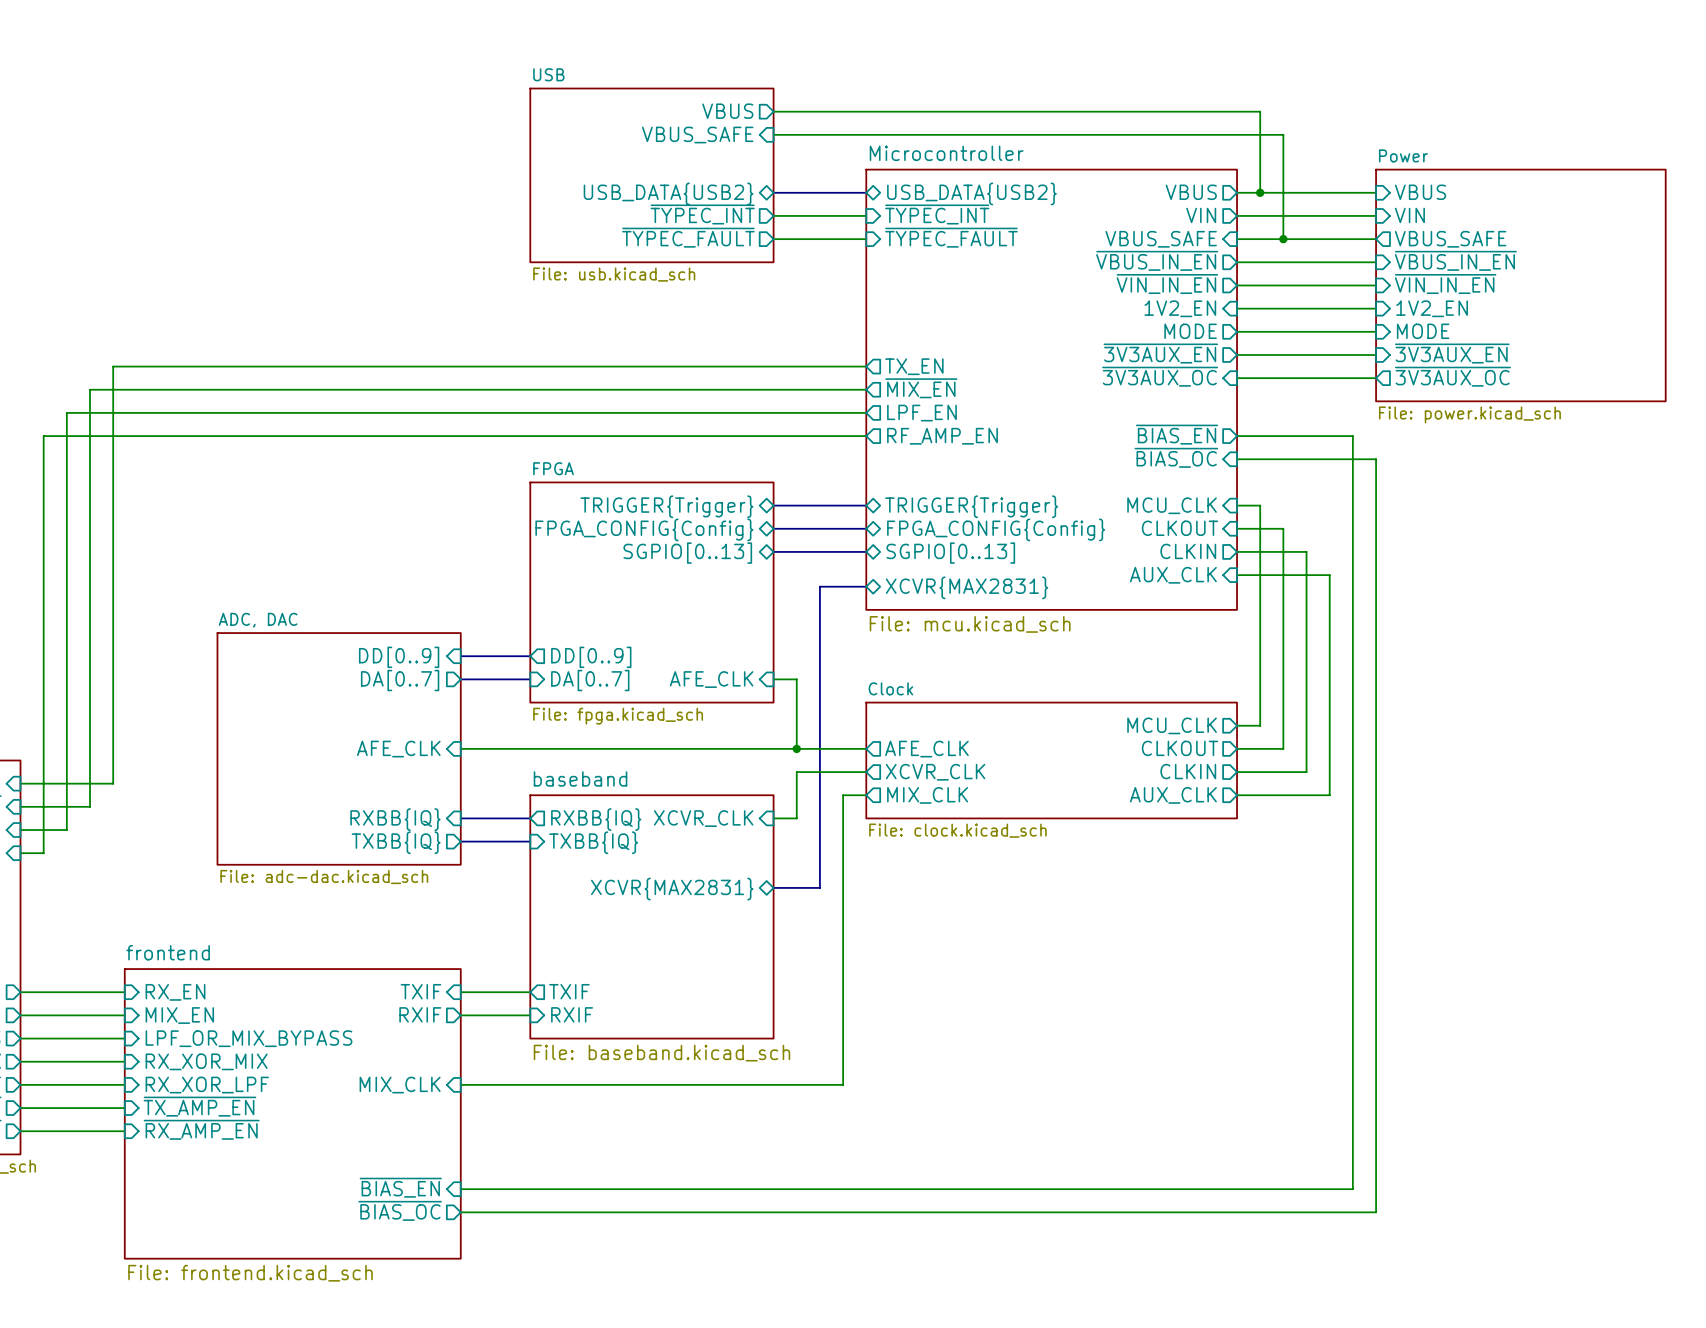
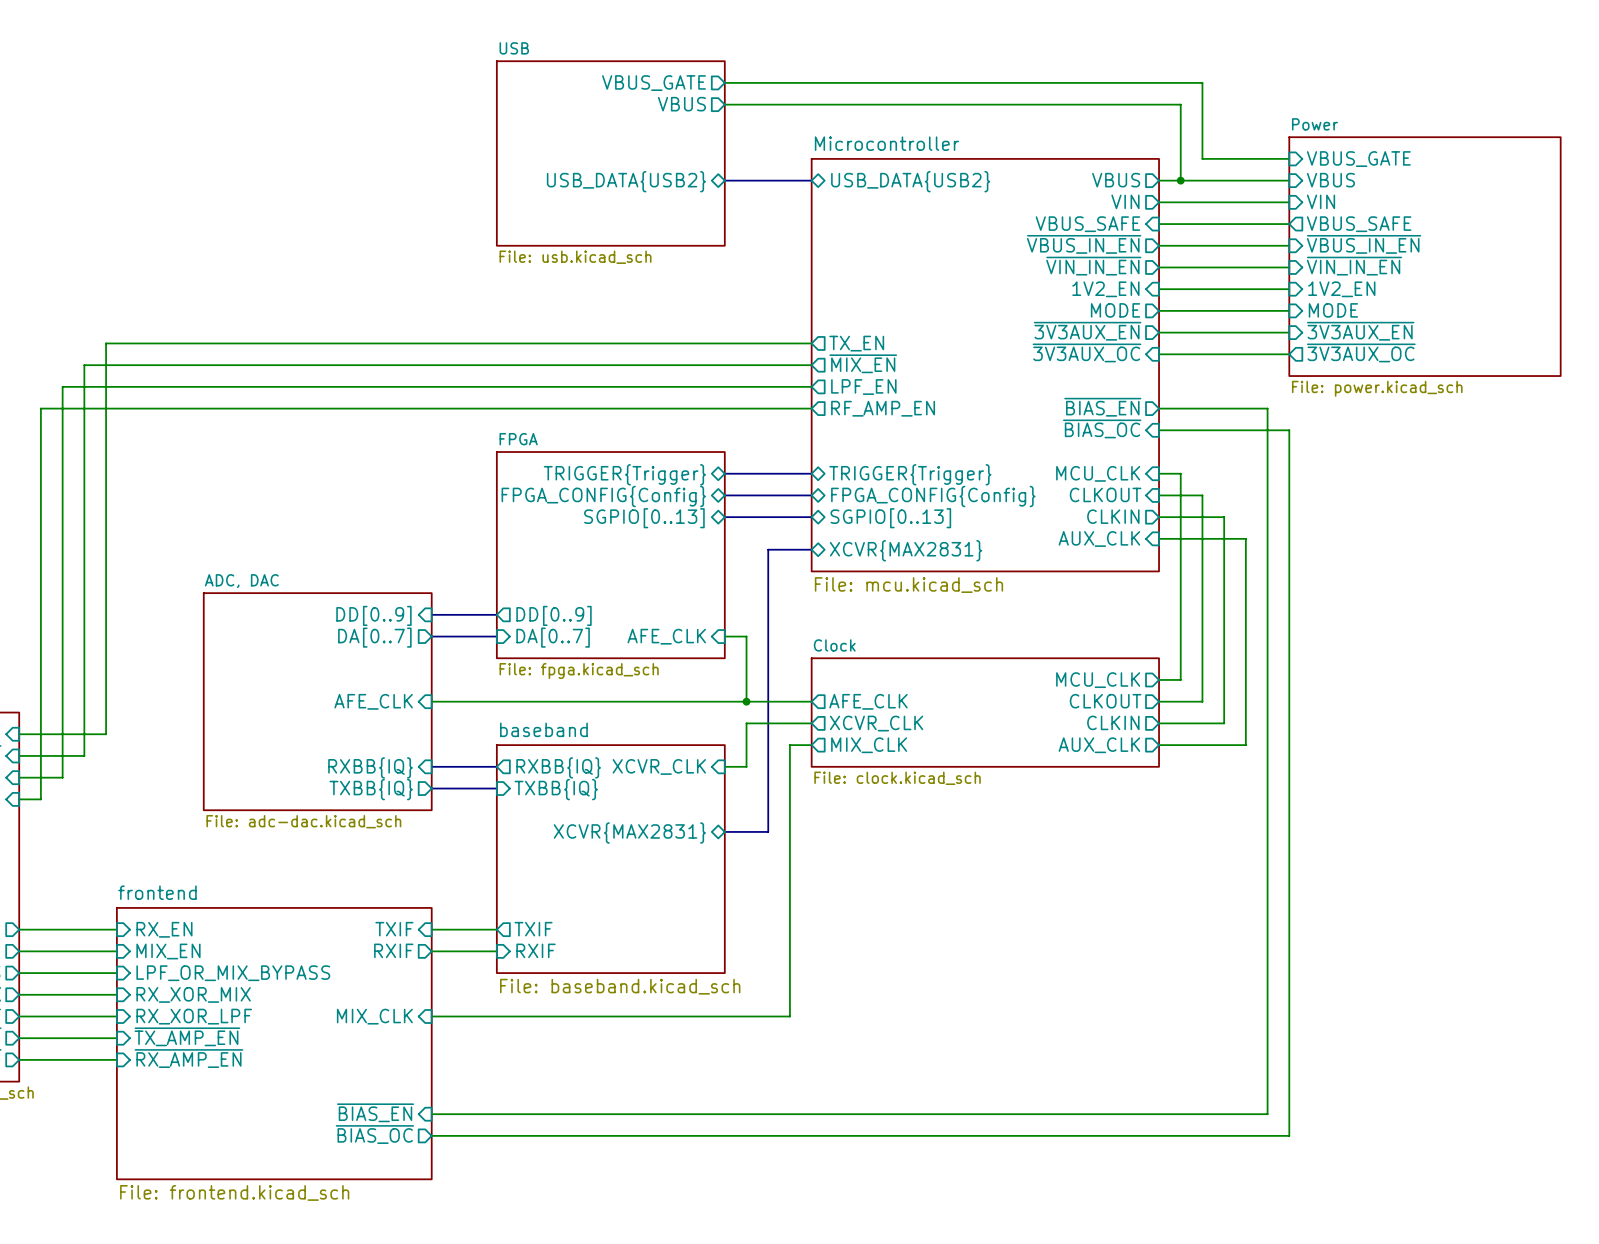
sheet pin: none -> VBUS_GATE (654, 83)
wire: (773, 134) (1283, 134) -> (724, 82) (1202, 82) (1202, 126)
sheet pin: VBUS_SAFE (697, 135) -> none
sheet USB: none -> File: usb.kicad_sch (610, 153)
wire: (1283, 169) (1283, 239) -> (1202, 158) (1289, 158)
sheet pin: none -> VBUS_GATE (1358, 159)
sheet USB: File: usb.kicad_sch (651, 175) -> none
sheet pin: ~{TYPEC_INT} (702, 214) -> none
sheet pin: ~{TYPEC_INT} (937, 214) -> none
wire: (773, 215) (866, 215) -> none
sheet pin: ~{TYPEC_FAULT} (688, 237) -> none
sheet pin: ~{TYPEC_FAULT} (951, 237) -> none
wire: (773, 239) (866, 239) -> none
junction: (1283, 239) -> none
sheet Power: none -> File: power.kicad_sch (1424, 256)
sheet Power: File: power.kicad_sch (1520, 285) -> none

